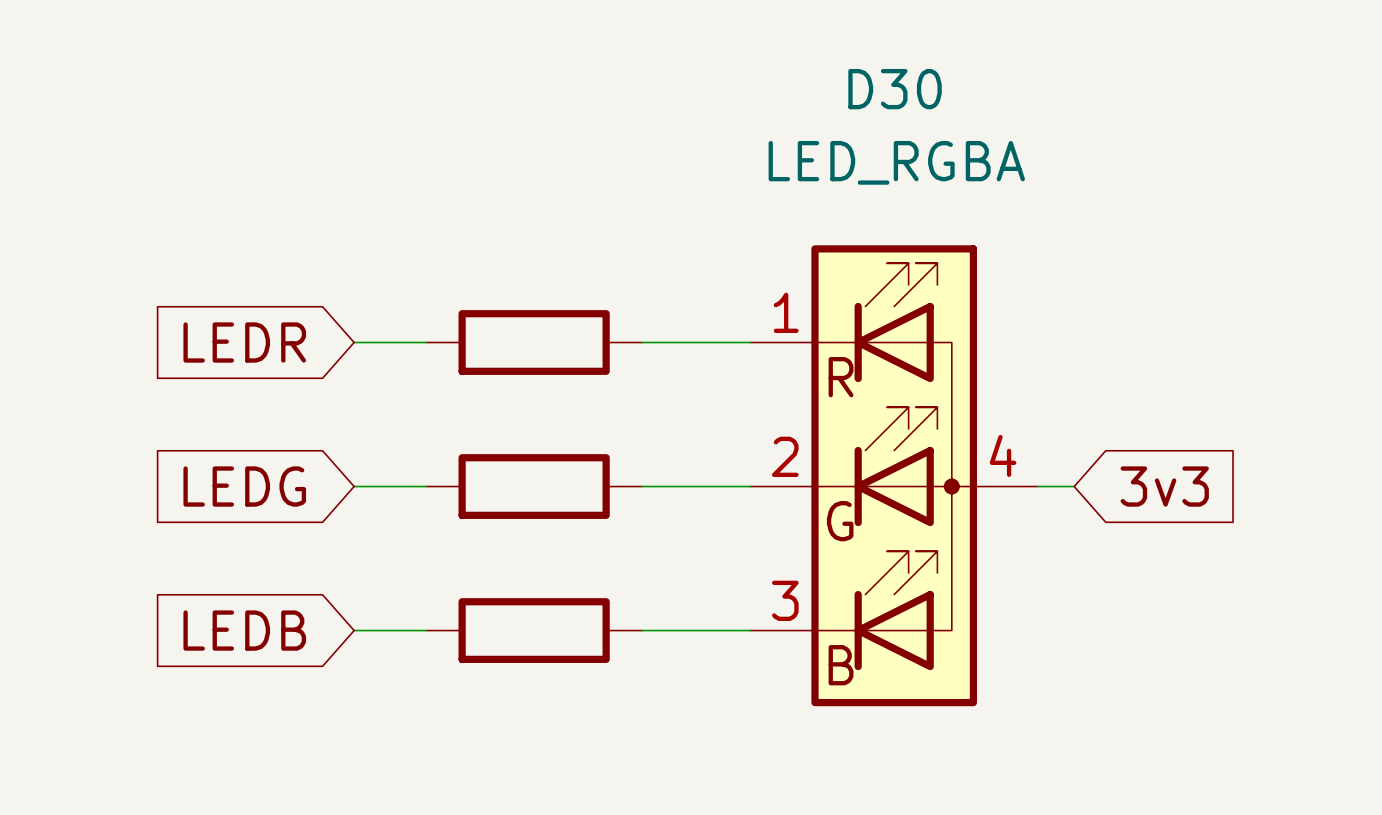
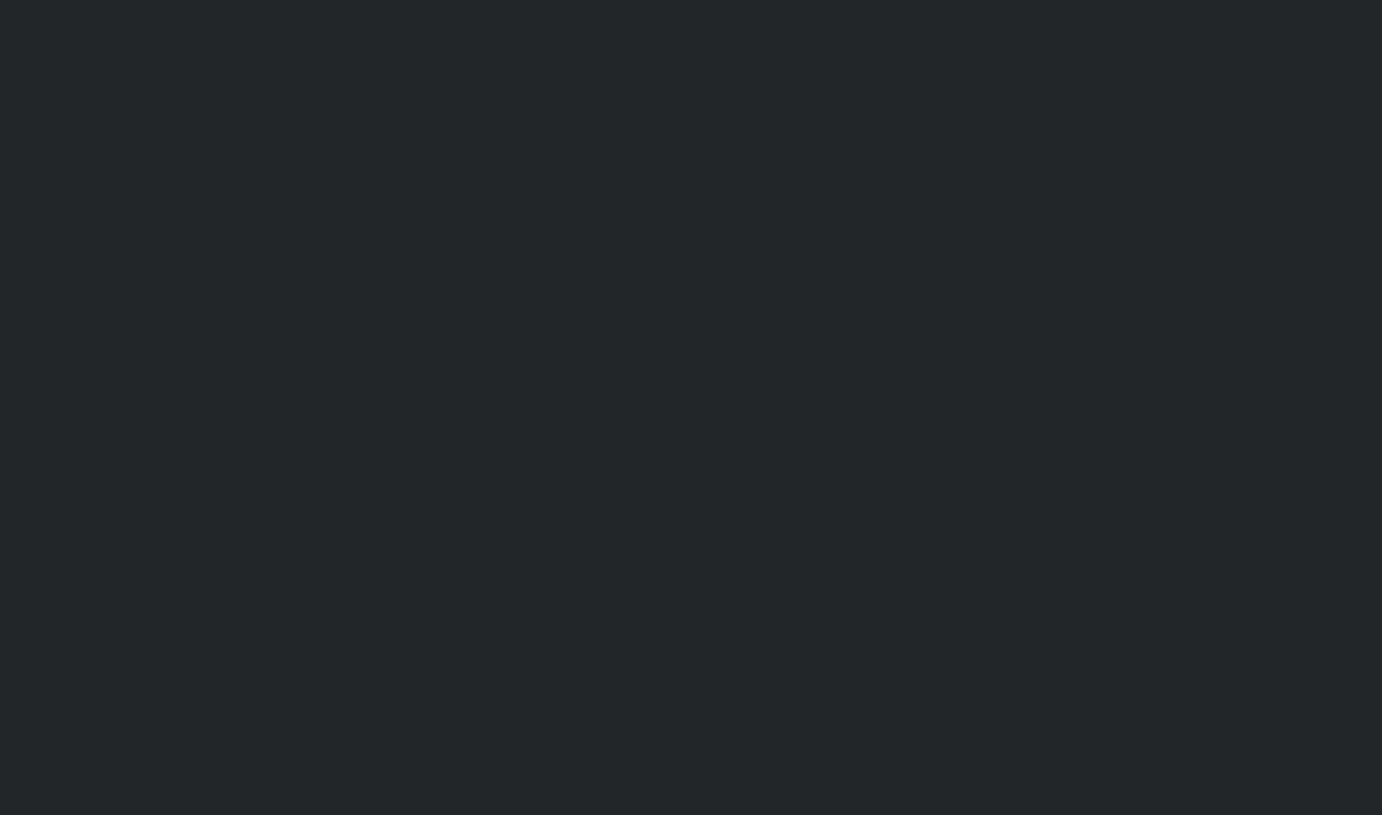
global label: LEDR (244, 342) -> none
wire: (354, 342) (426, 342) -> none
part: (534, 342) -> none
wire: (642, 342) (750, 342) -> none
D30: LED_RGBA (894, 475) -> none
global label: LEDG (244, 486) -> none
wire: (354, 486) (426, 486) -> none
part: (534, 486) -> none
wire: (642, 486) (750, 486) -> none
wire: (1038, 486) (1074, 486) -> none
global label: 3v3 (1164, 486) -> none
global label: LEDB (244, 630) -> none
wire: (354, 630) (426, 630) -> none
part: (534, 630) -> none
wire: (642, 630) (750, 630) -> none

